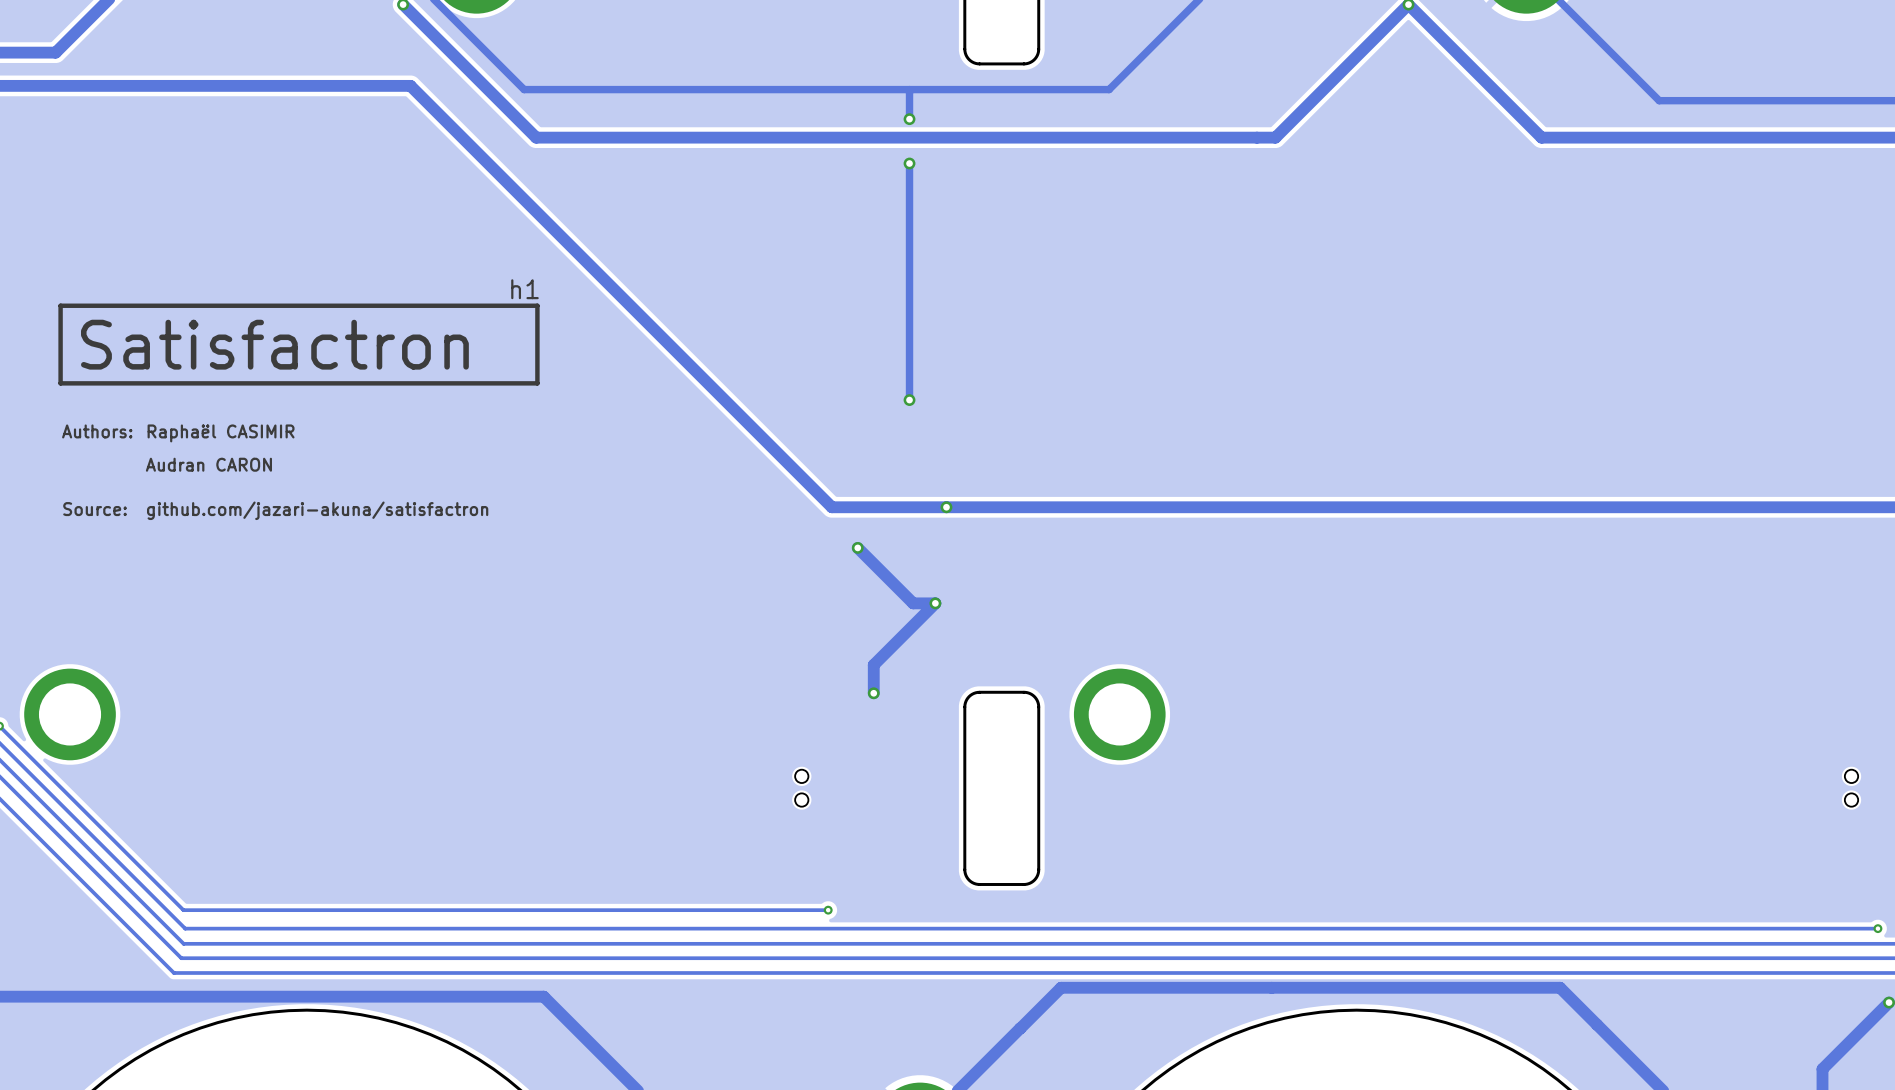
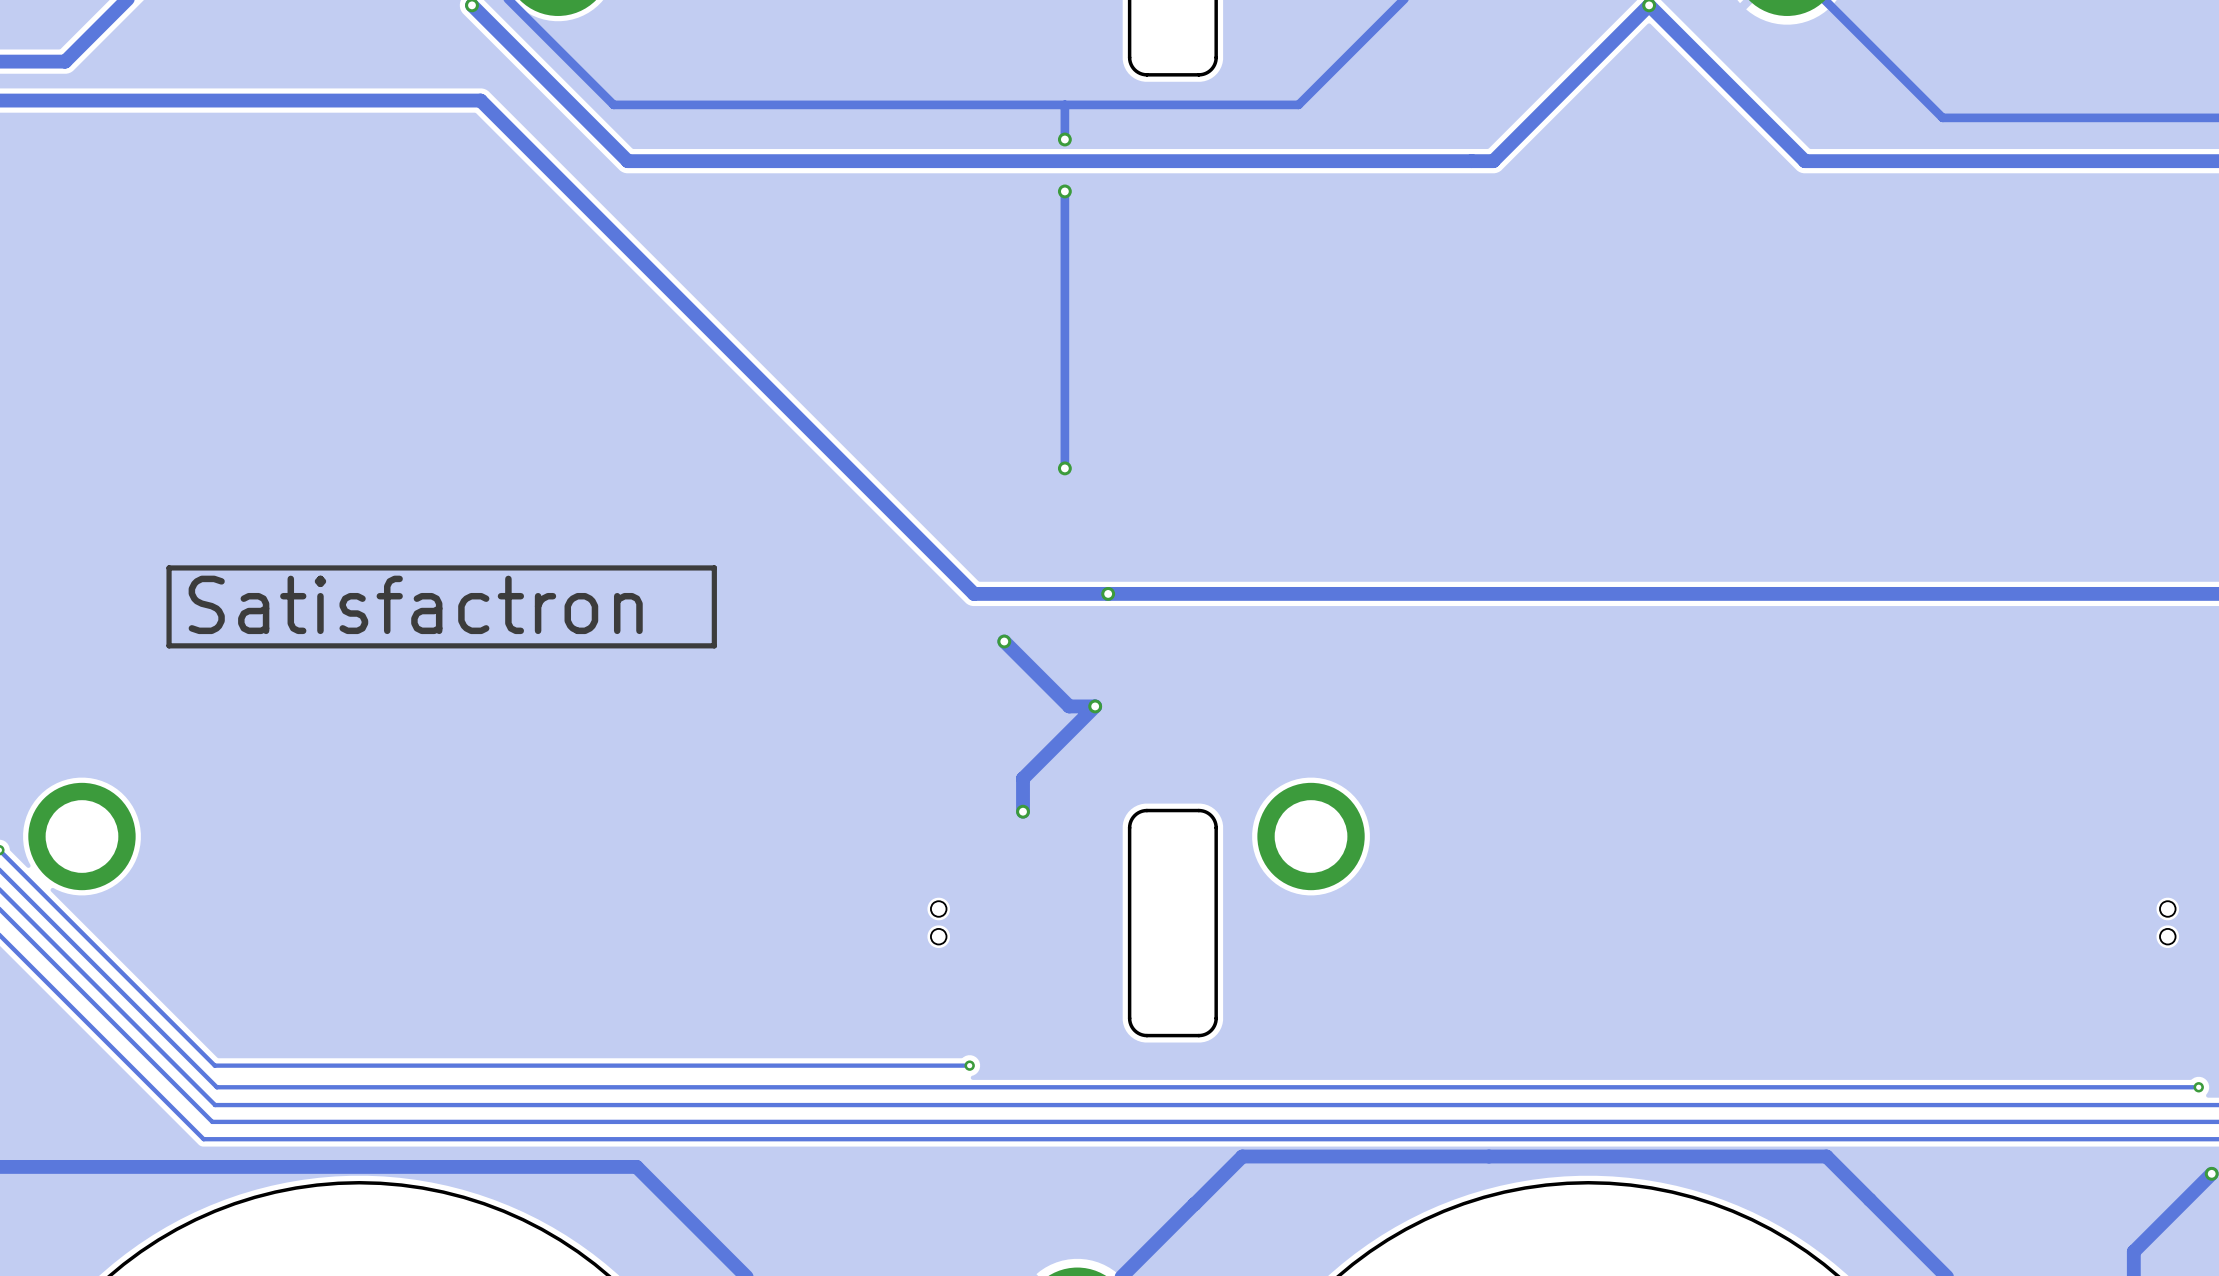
text: h1 (524, 289) -> none
line: (537, 305) (60, 305) (60, 383) (537, 383) (537, 305) -> none
text position: Satisfactron (274, 344) -> Satisfactron (415, 604)
text: Authors: (97, 431) -> none
text: Raphaël CASIMIR (221, 433) -> none
text: Audran CARON (208, 464) -> none
line: none -> (714, 567) (169, 567) (169, 645) (714, 645) (714, 567)
text: Source: (95, 509) -> none
text: github.com/jazari-akuna/satisfactron (317, 510) -> none

